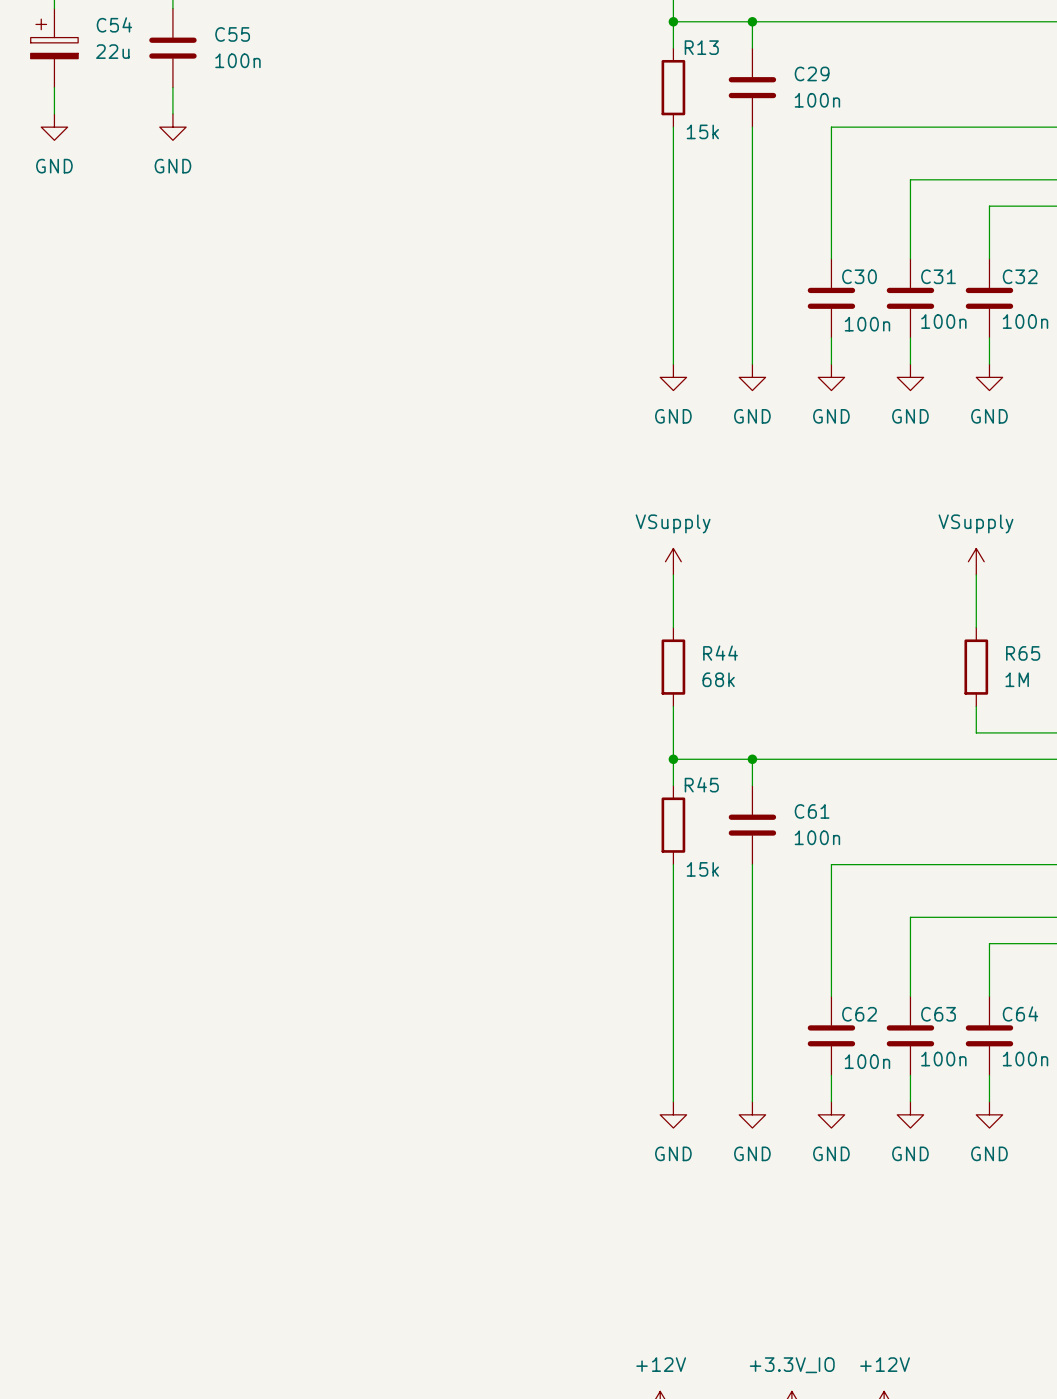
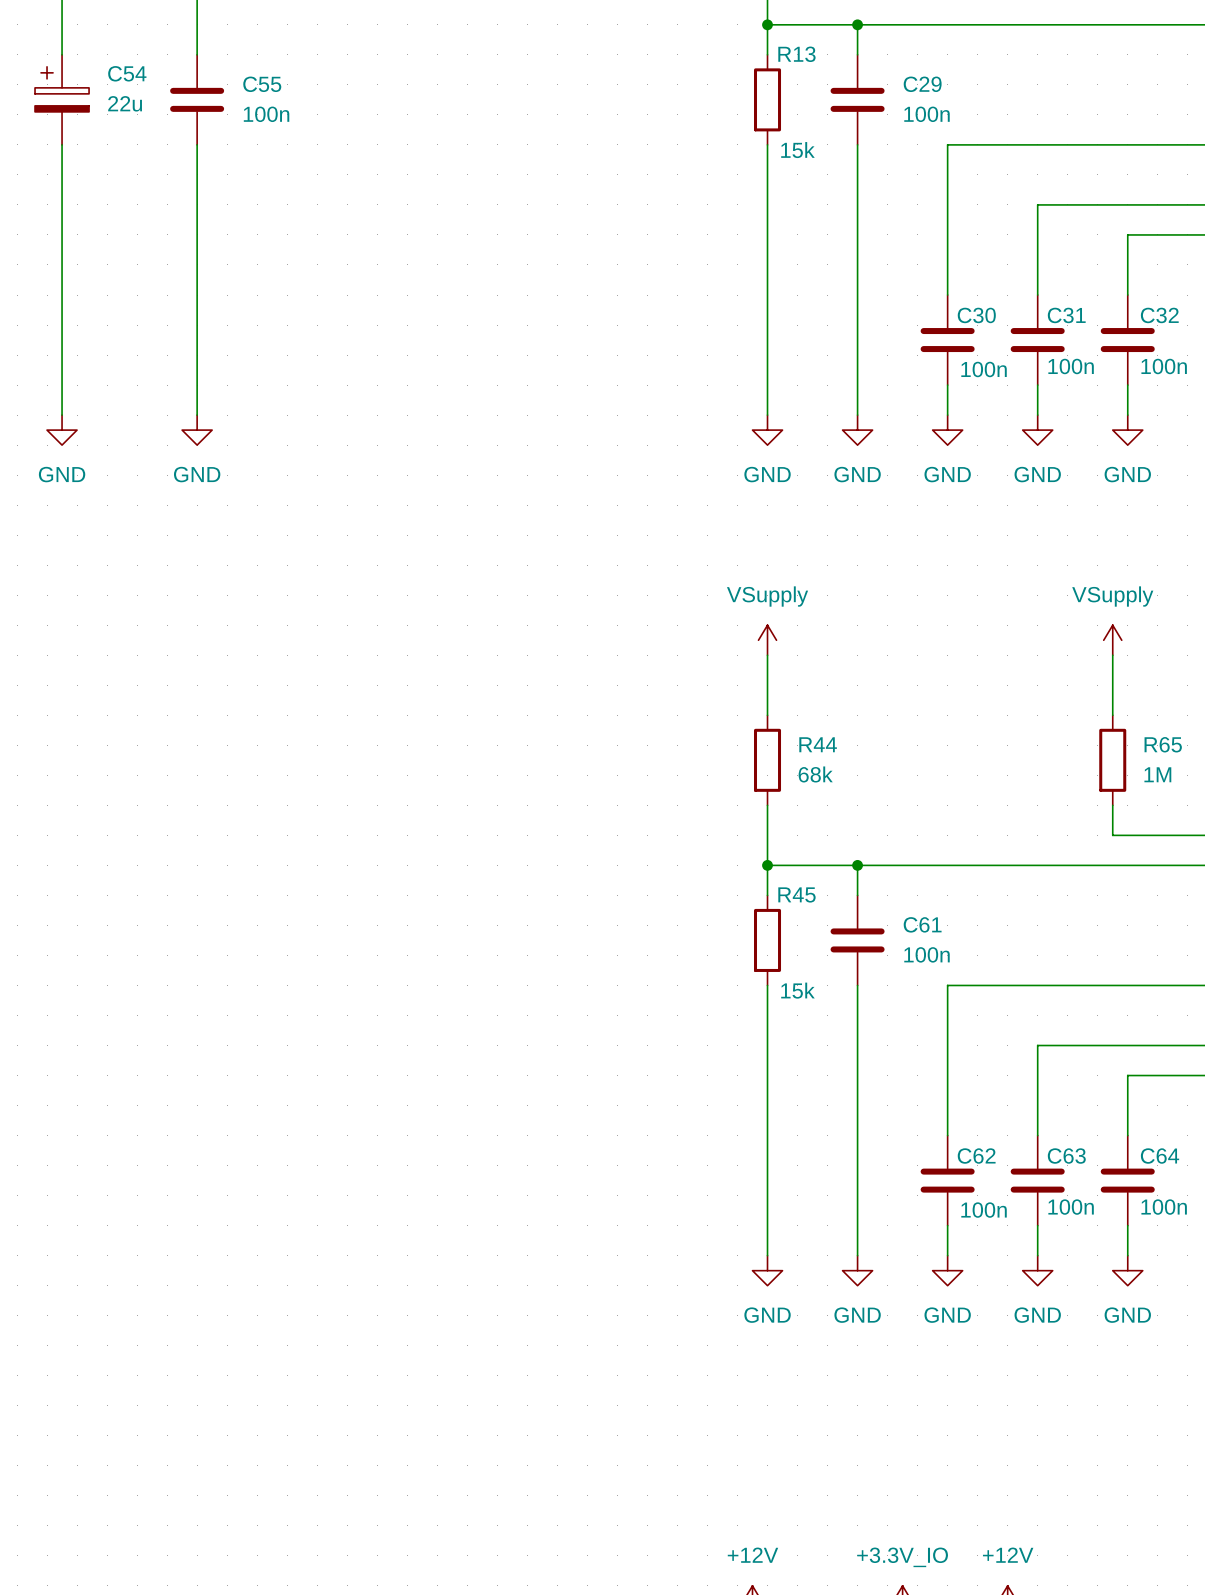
C54 position: (54, 48) -> (62, 99)
C55 position: (172, 48) -> (197, 99)
wire: none -> (62, 144) (62, 415)
power symbol: GND (54, 127) -> none
wire: none -> (197, 144) (197, 415)
power symbol: GND (172, 127) -> none
power symbol: none -> GND (62, 430)
power symbol: none -> GND (197, 430)

